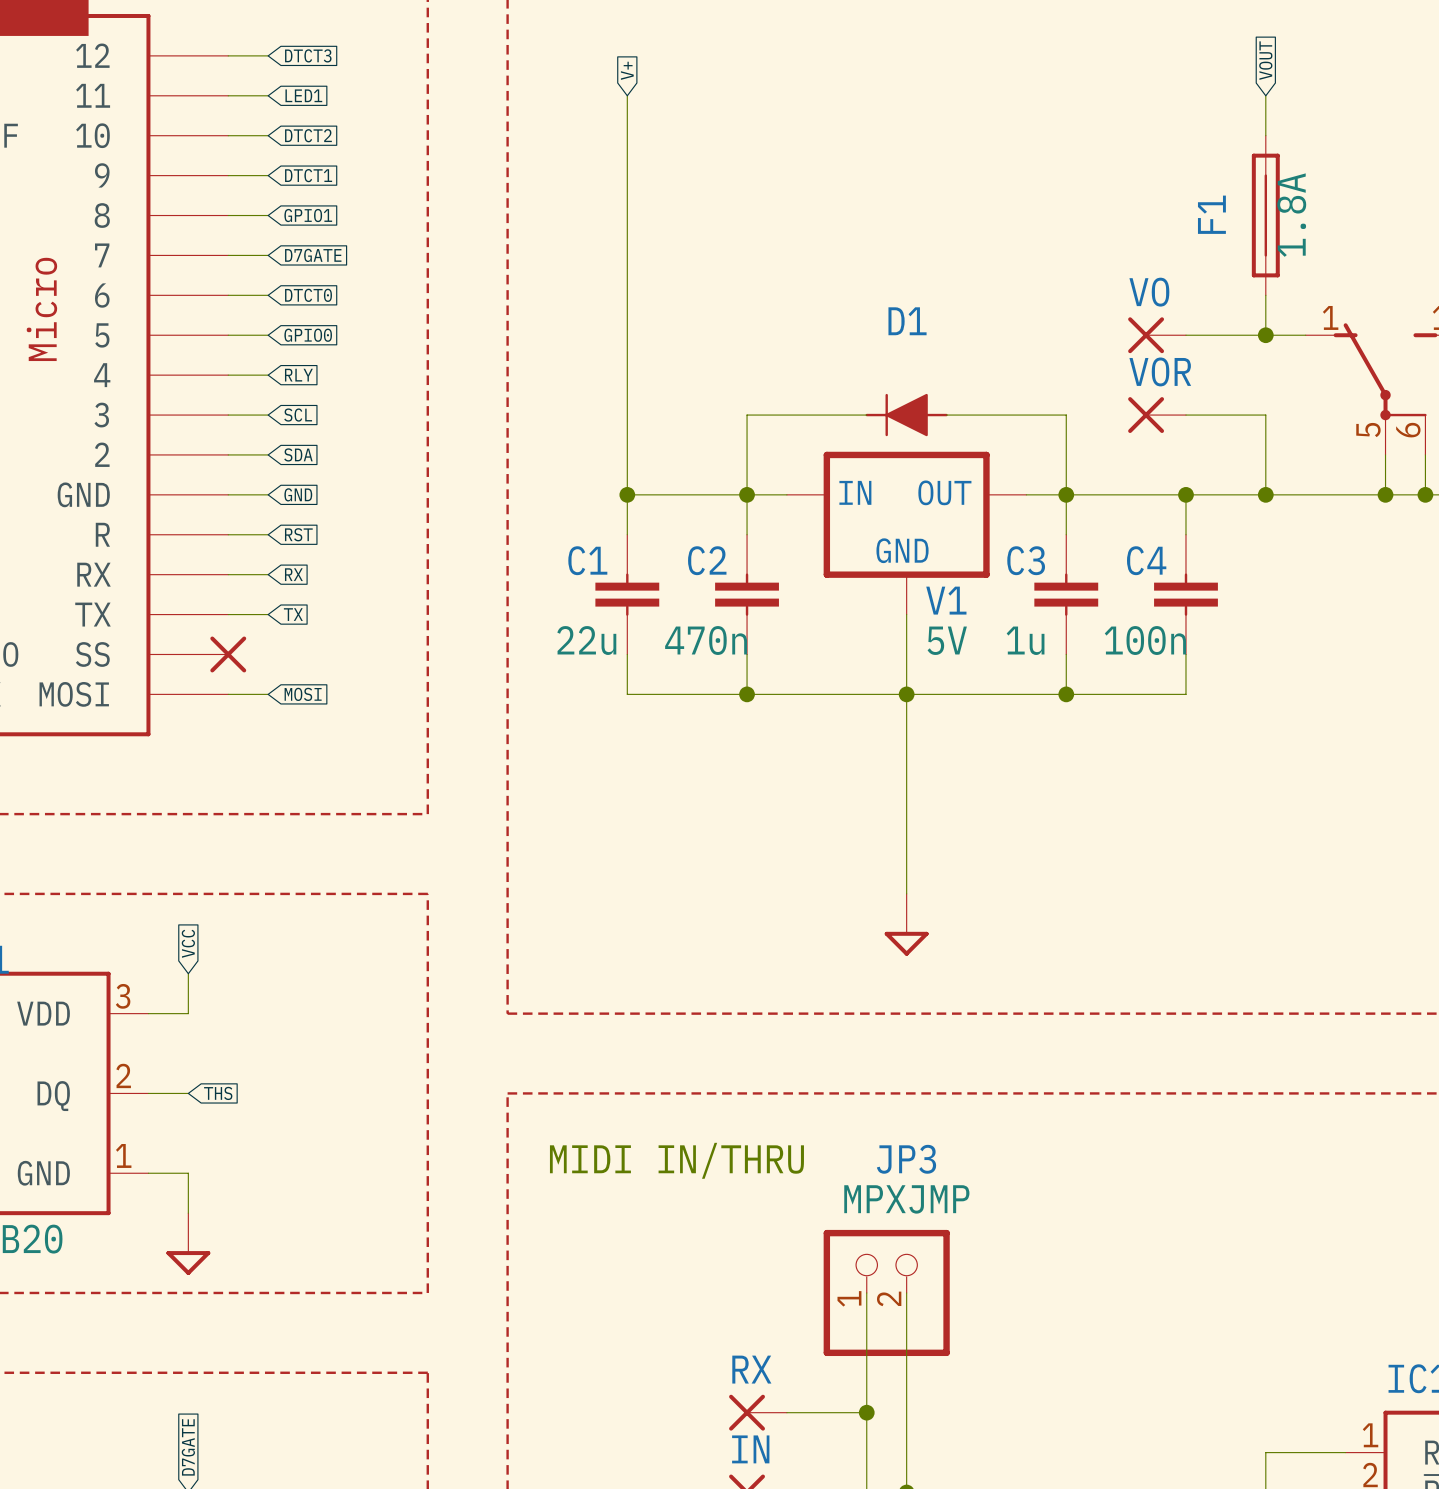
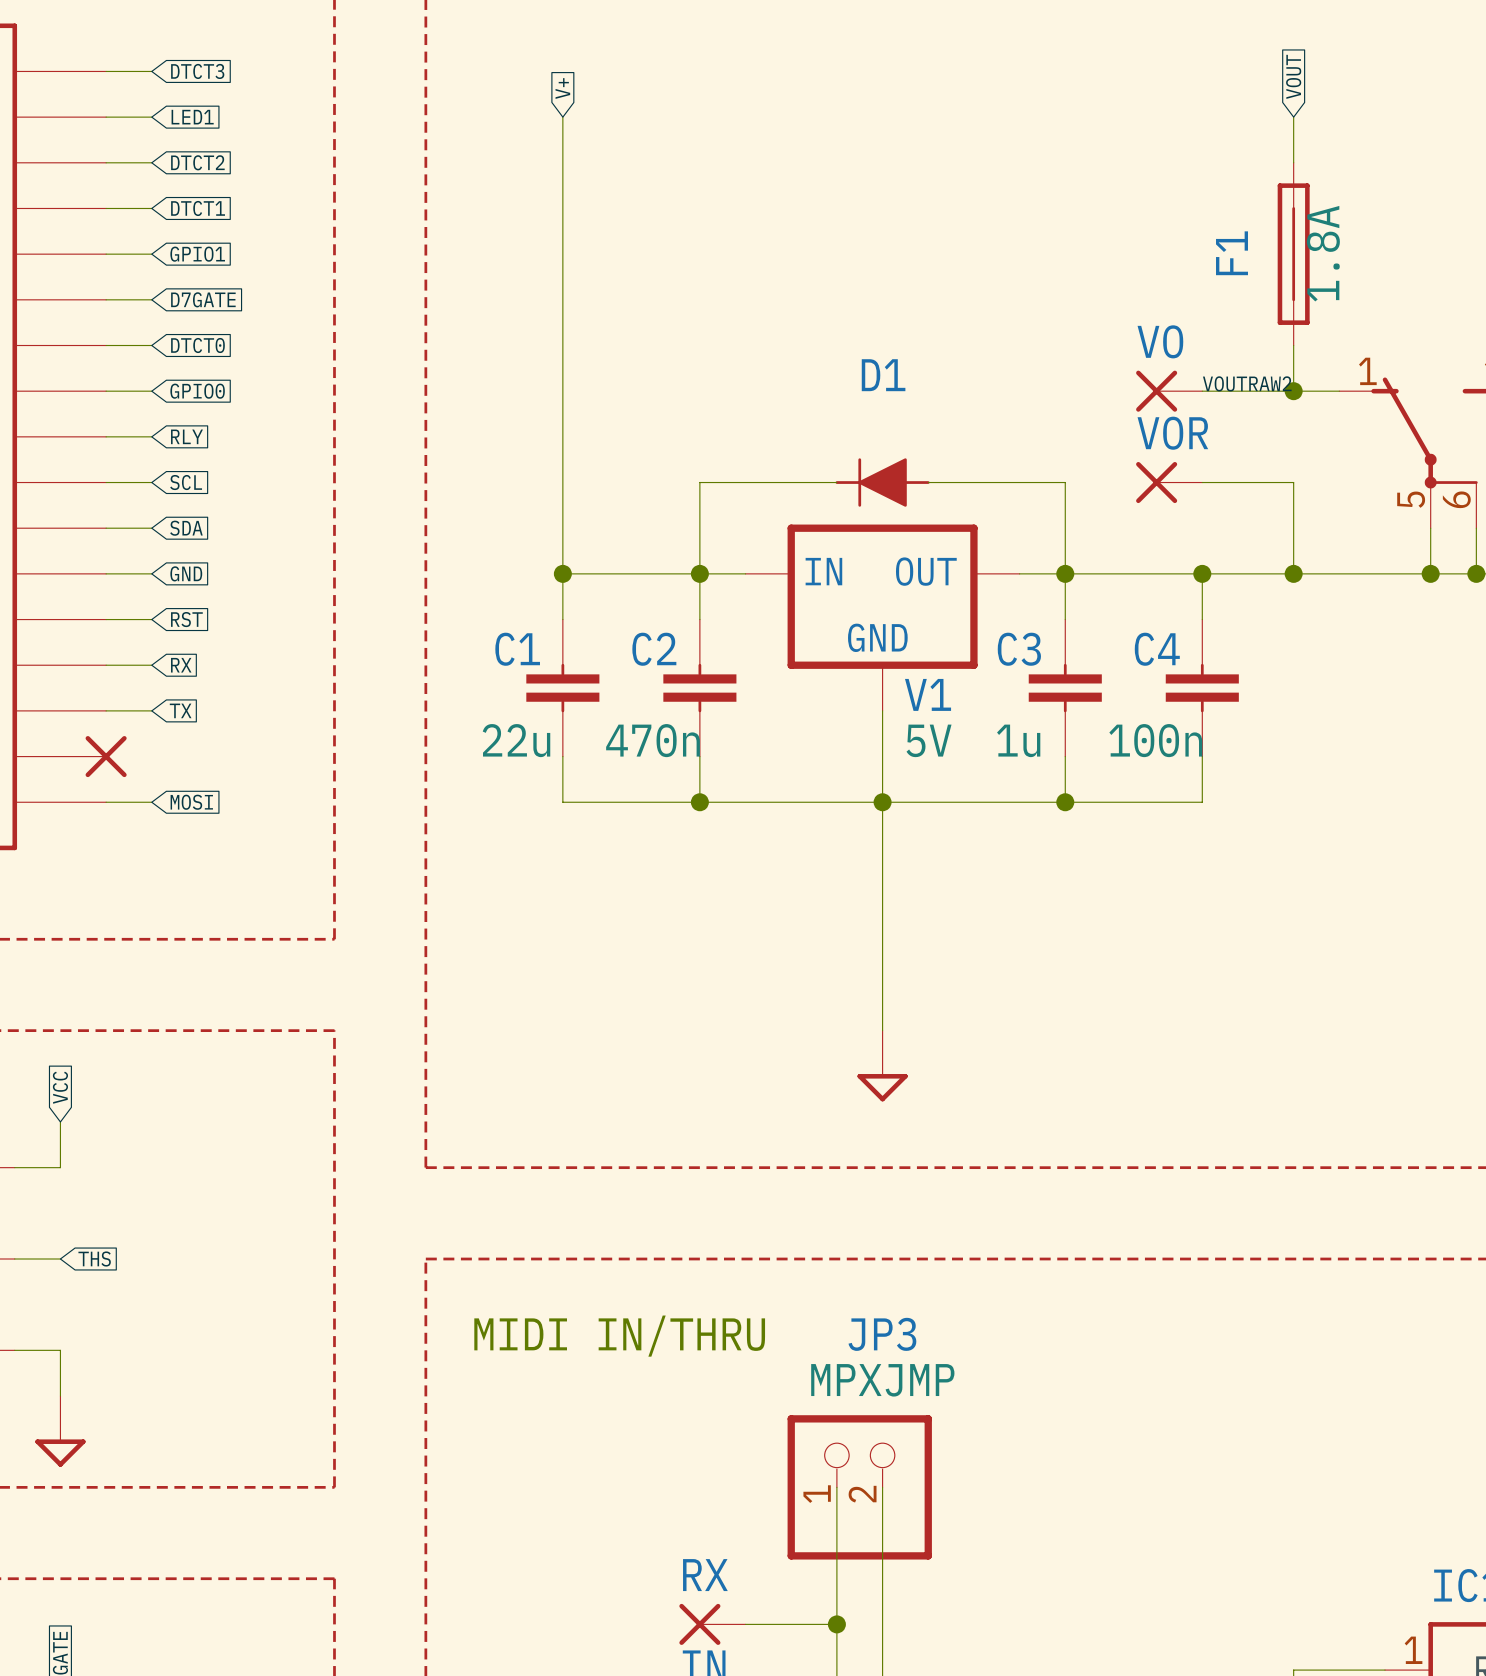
label: none -> VOUTRAW2 (1247, 383)

